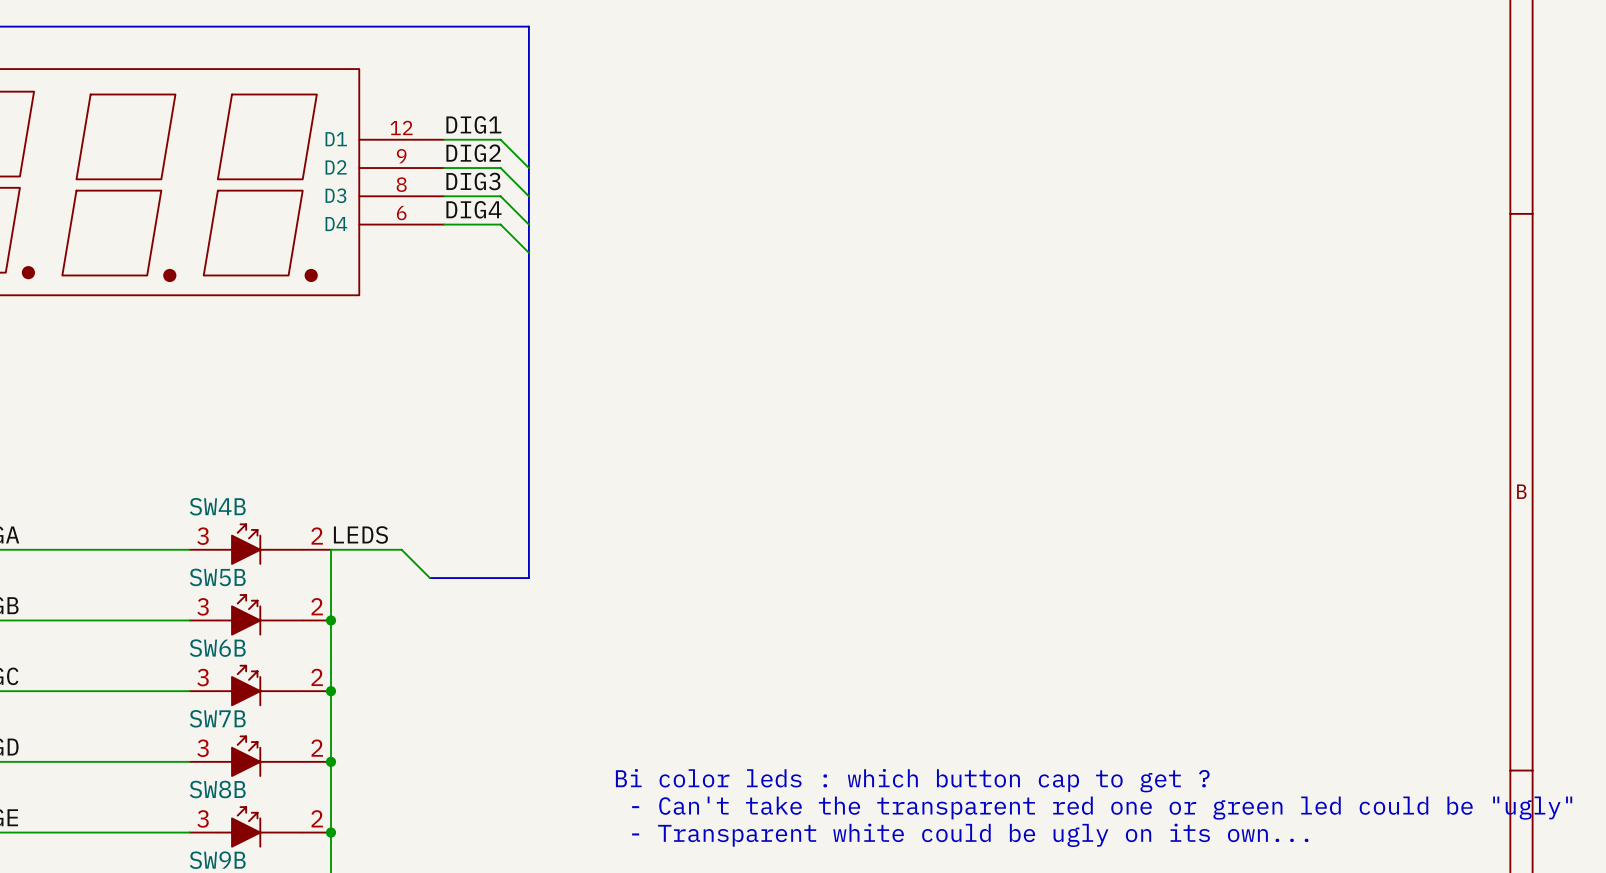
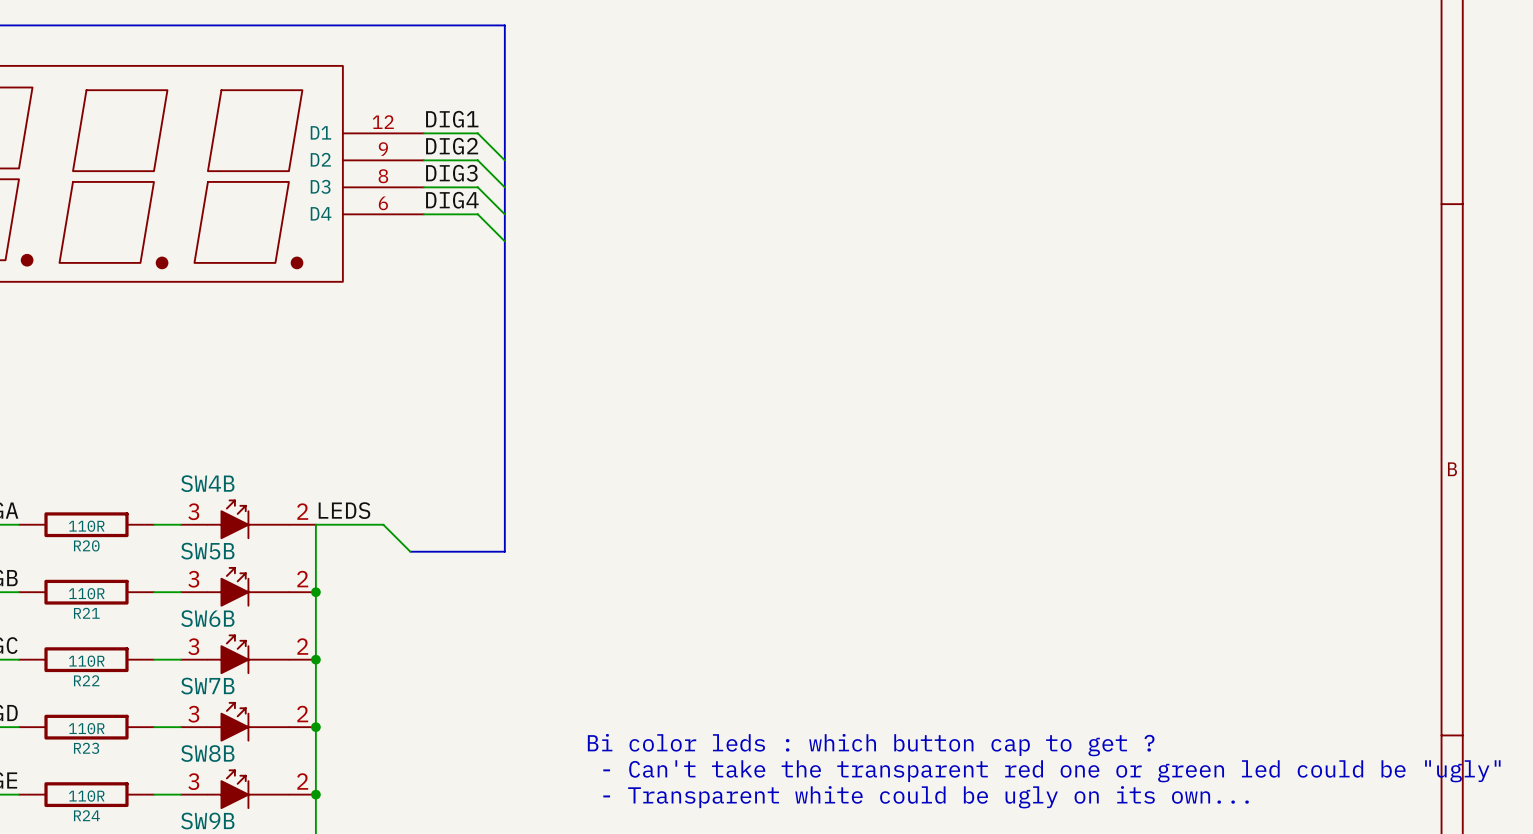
wire: (19, 549) (161, 549) -> none
R20: none -> 110R (86, 524)
wire: (19, 620) (161, 620) -> none
R21: none -> 110R (86, 592)
wire: (19, 691) (161, 691) -> none
R22: none -> 110R (86, 659)
wire: (19, 761) (161, 761) -> none
R23: none -> 110R (86, 727)
wire: (19, 832) (161, 832) -> none
R24: none -> 110R (86, 794)

